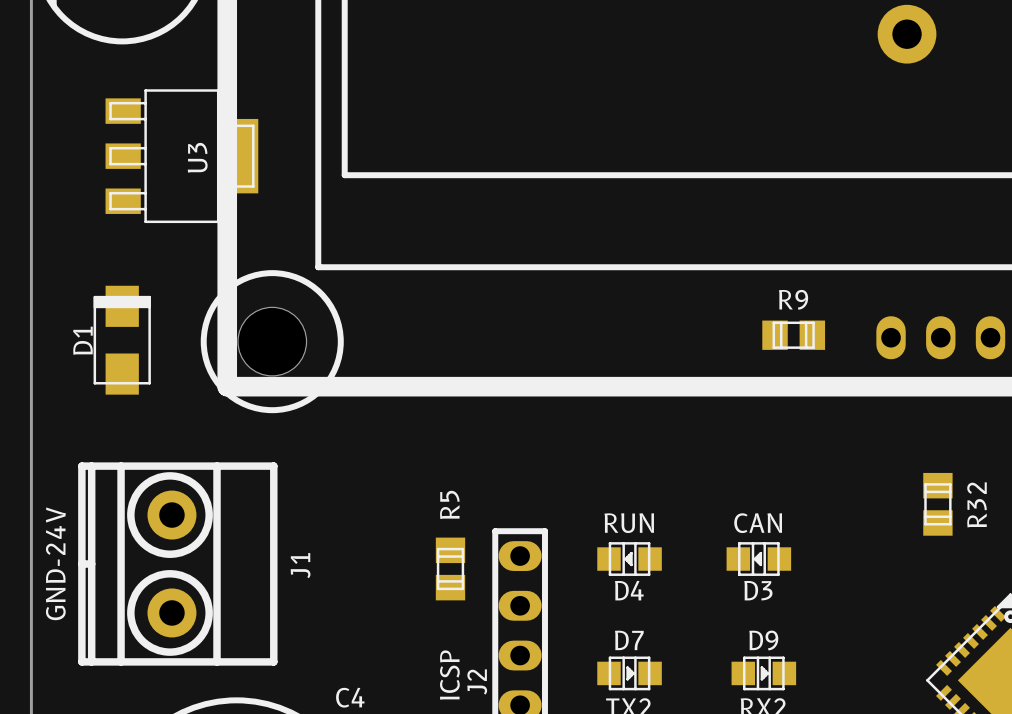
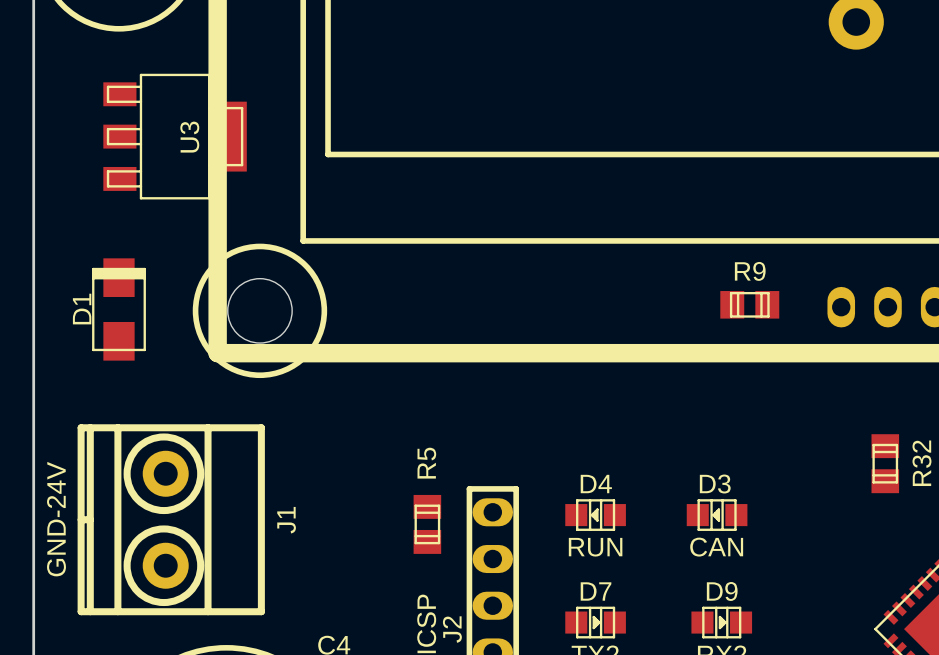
D4 value position: RUN (629, 523) -> RUN (595, 547)
D3 value position: CAN (758, 523) -> CAN (716, 547)
D4 name position: D4 (629, 590) -> D4 (596, 484)
D3 name position: D3 (758, 590) -> D3 (715, 484)

